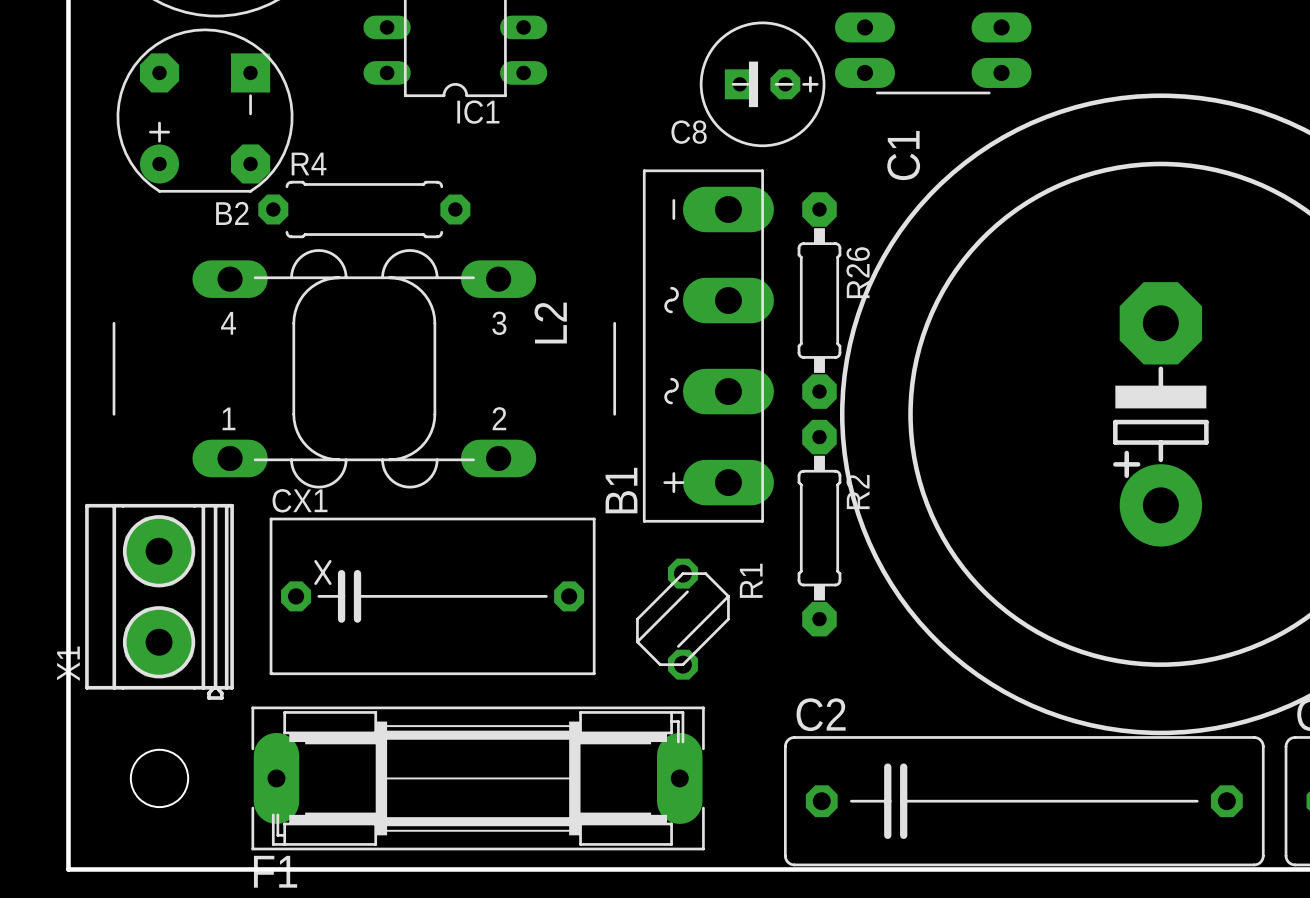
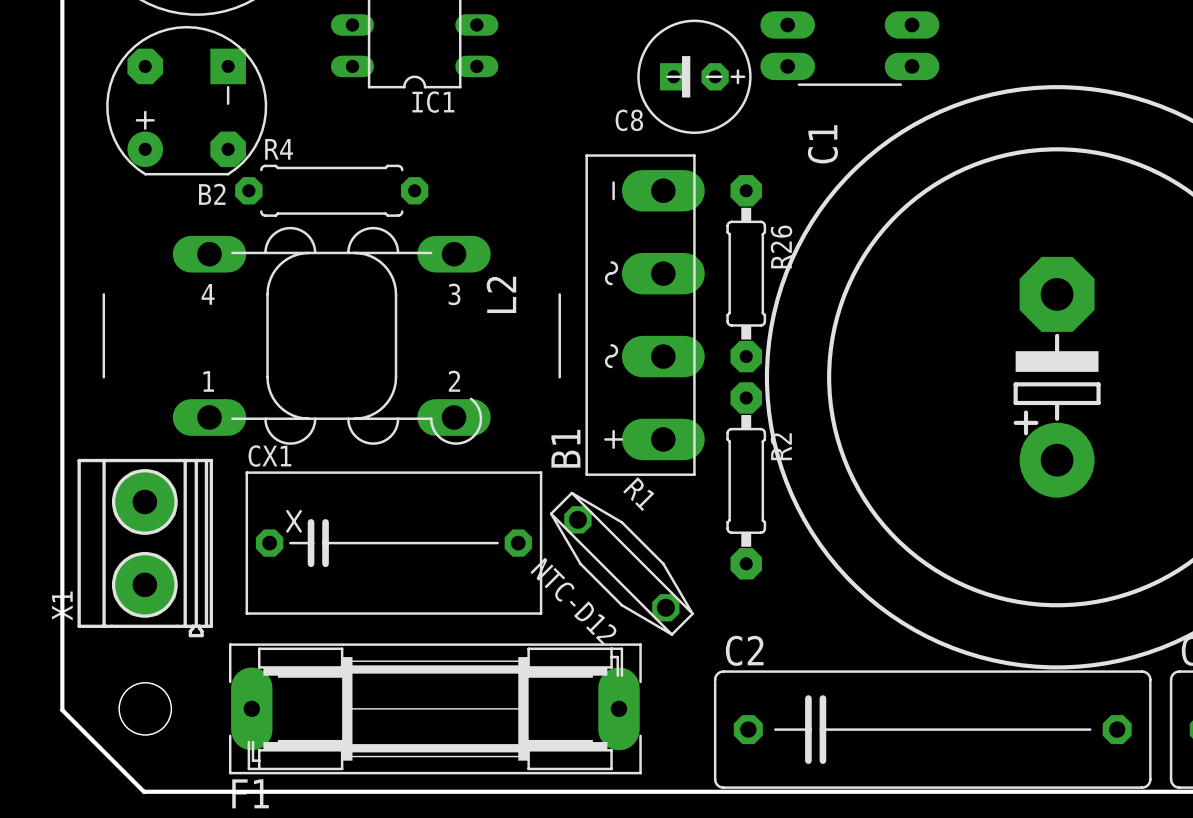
L2 footprint: [112, 249, 617, 489] -> [102, 226, 561, 445]
R1 footprint: [636, 558, 730, 680] -> [549, 491, 694, 636]
R1 name position: R1 (751, 580) -> R1 (638, 494)
R1 value: none -> NTC-D12 (573, 601)
board edge: (68, 779) (68, 869) (158, 869) -> (62, 710) (143, 791)

